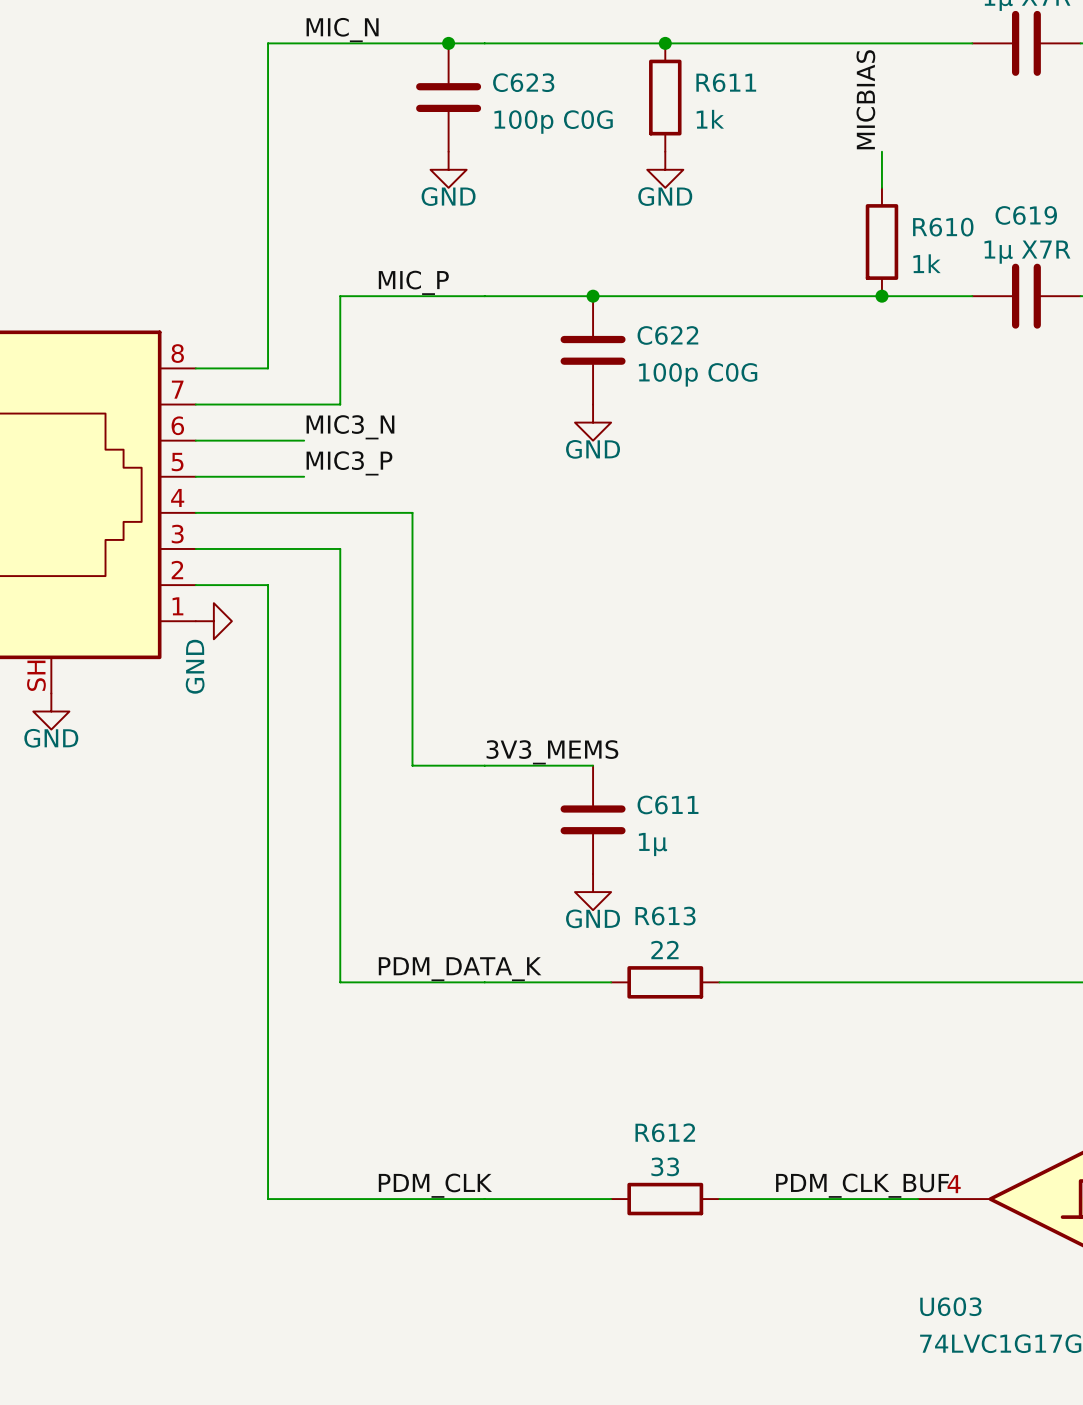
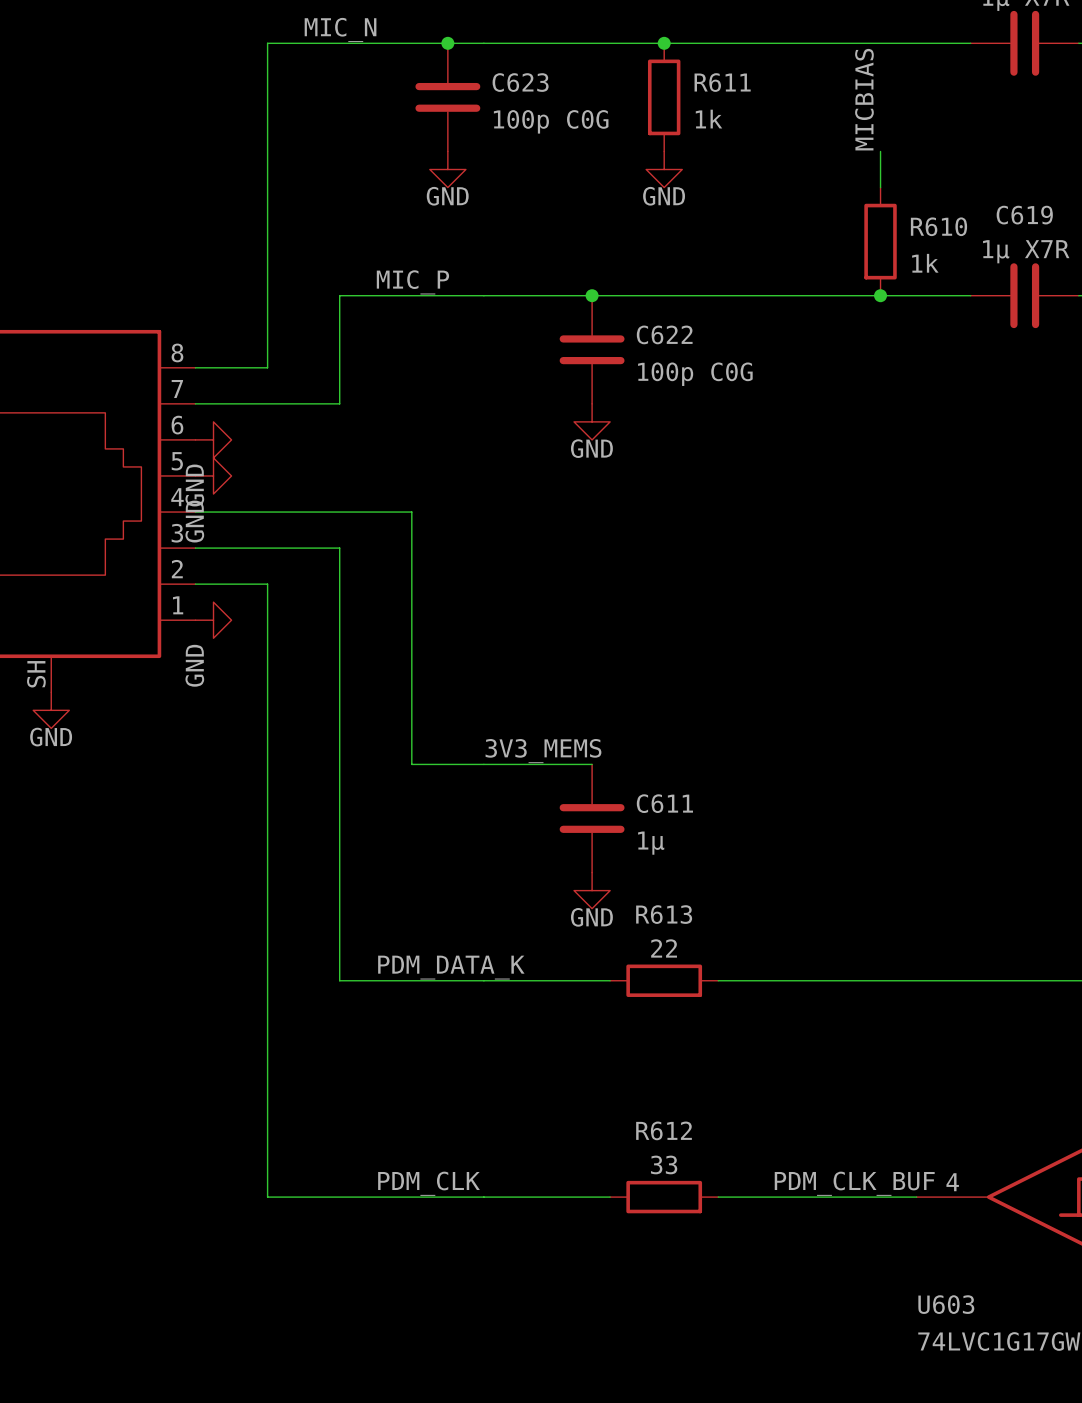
label: MIC3_N (350, 427) -> none
wire: (195, 440) (304, 440) -> none
power symbol: none -> GND (213, 439)
label: MIC3_P (349, 463) -> none
wire: (195, 476) (304, 476) -> none
power symbol: none -> GND (213, 475)

